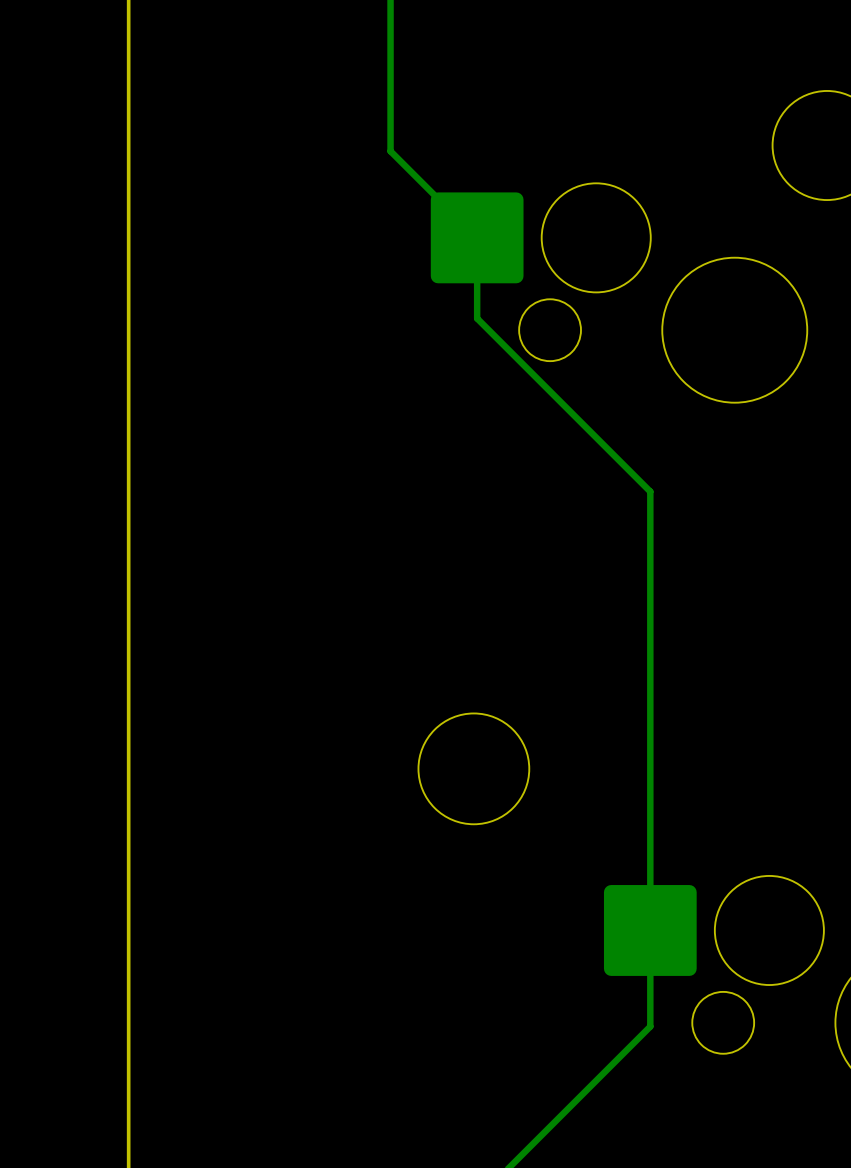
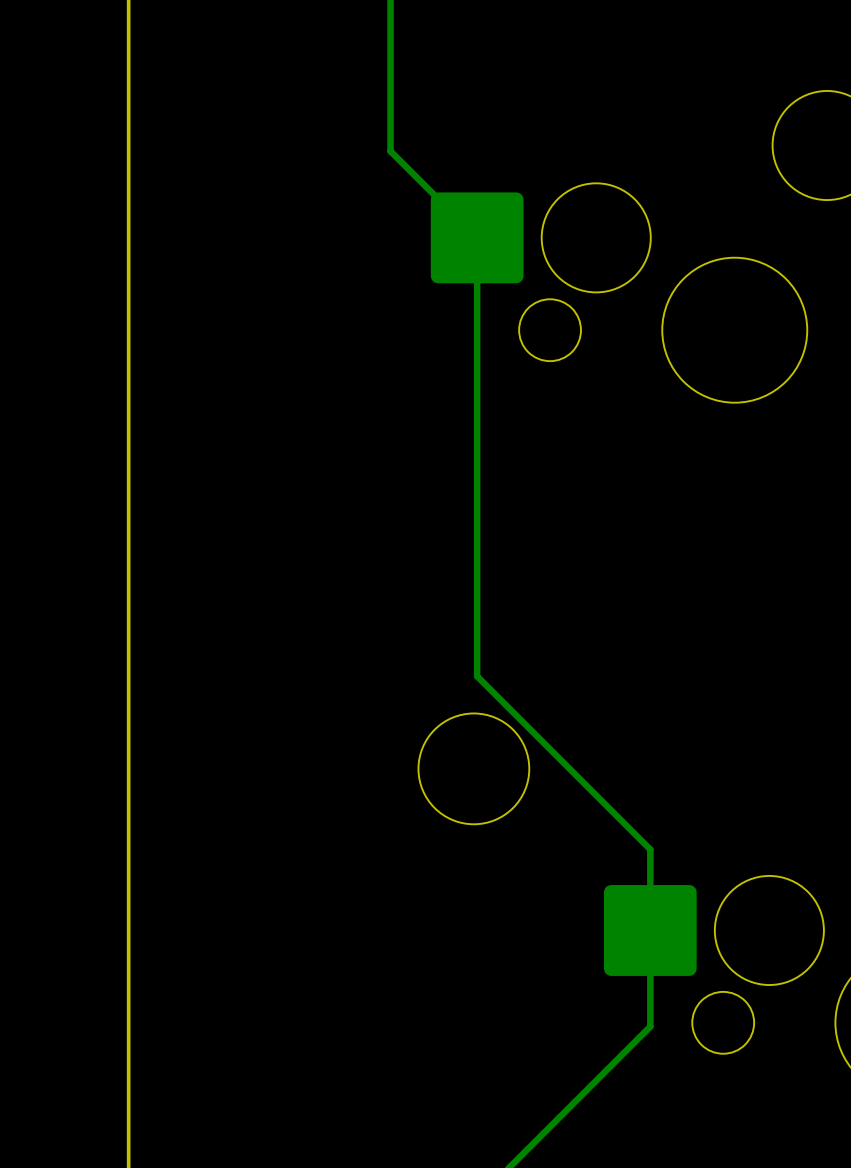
bottom track: (477, 318) (650, 491) (650, 849) -> (477, 318) (477, 676) (650, 849)

